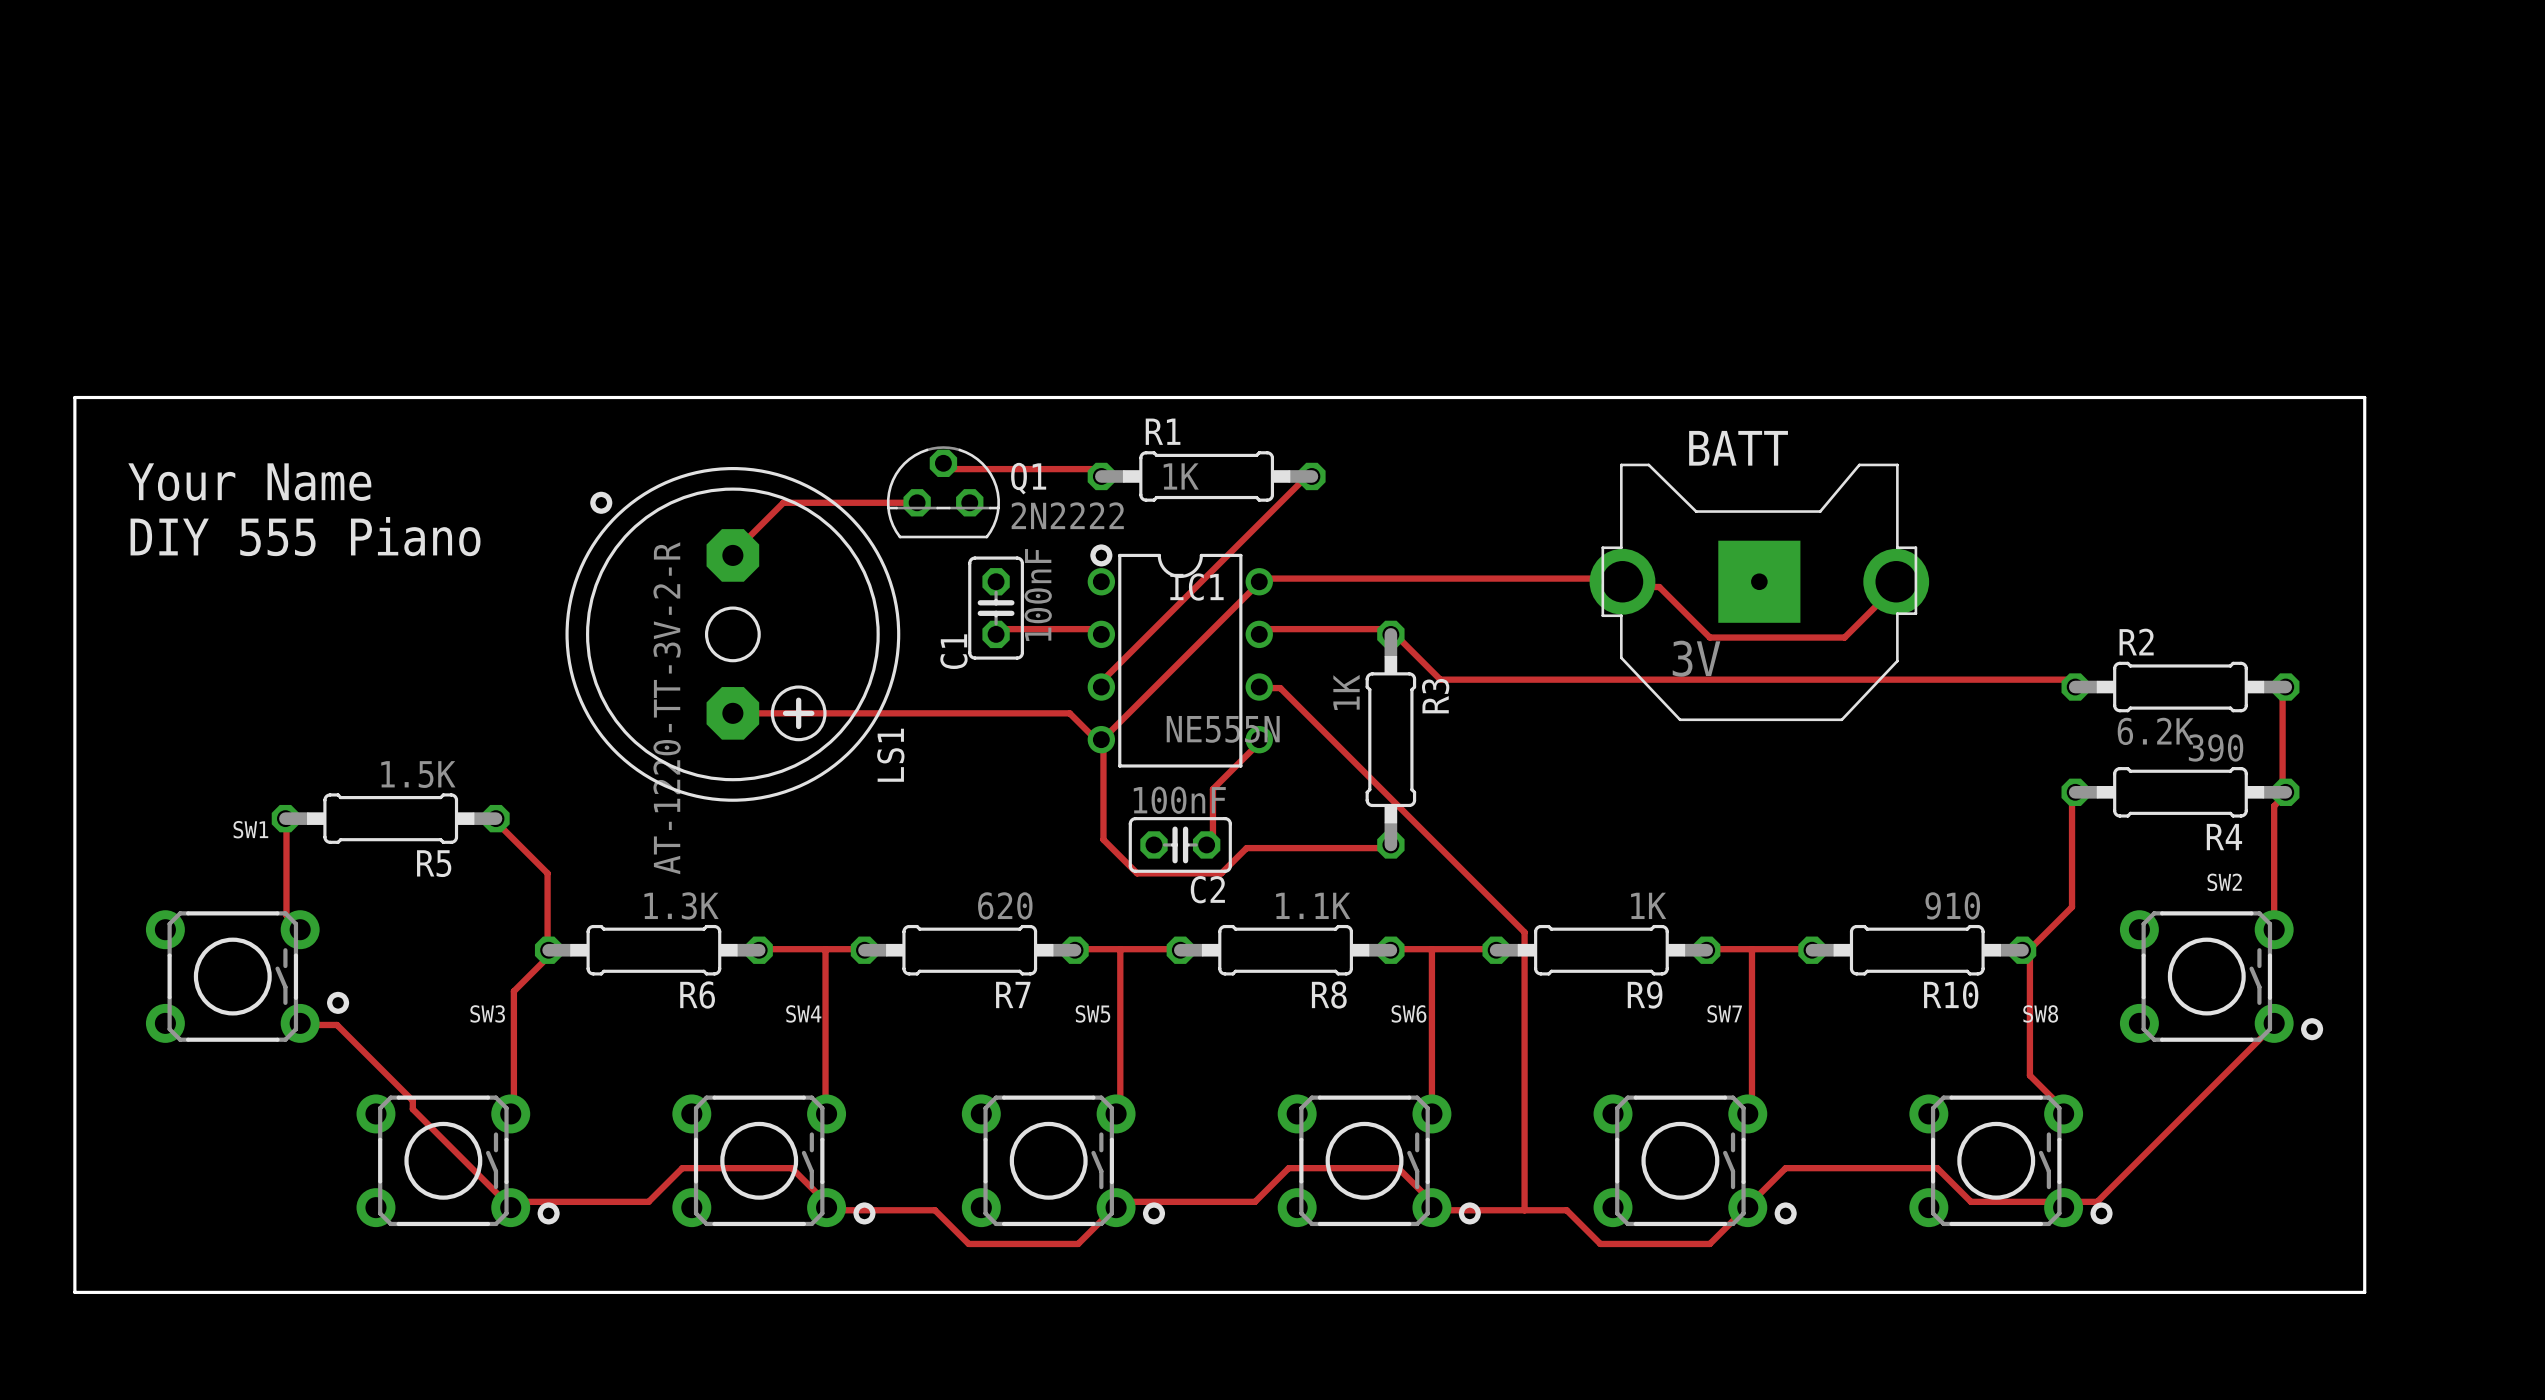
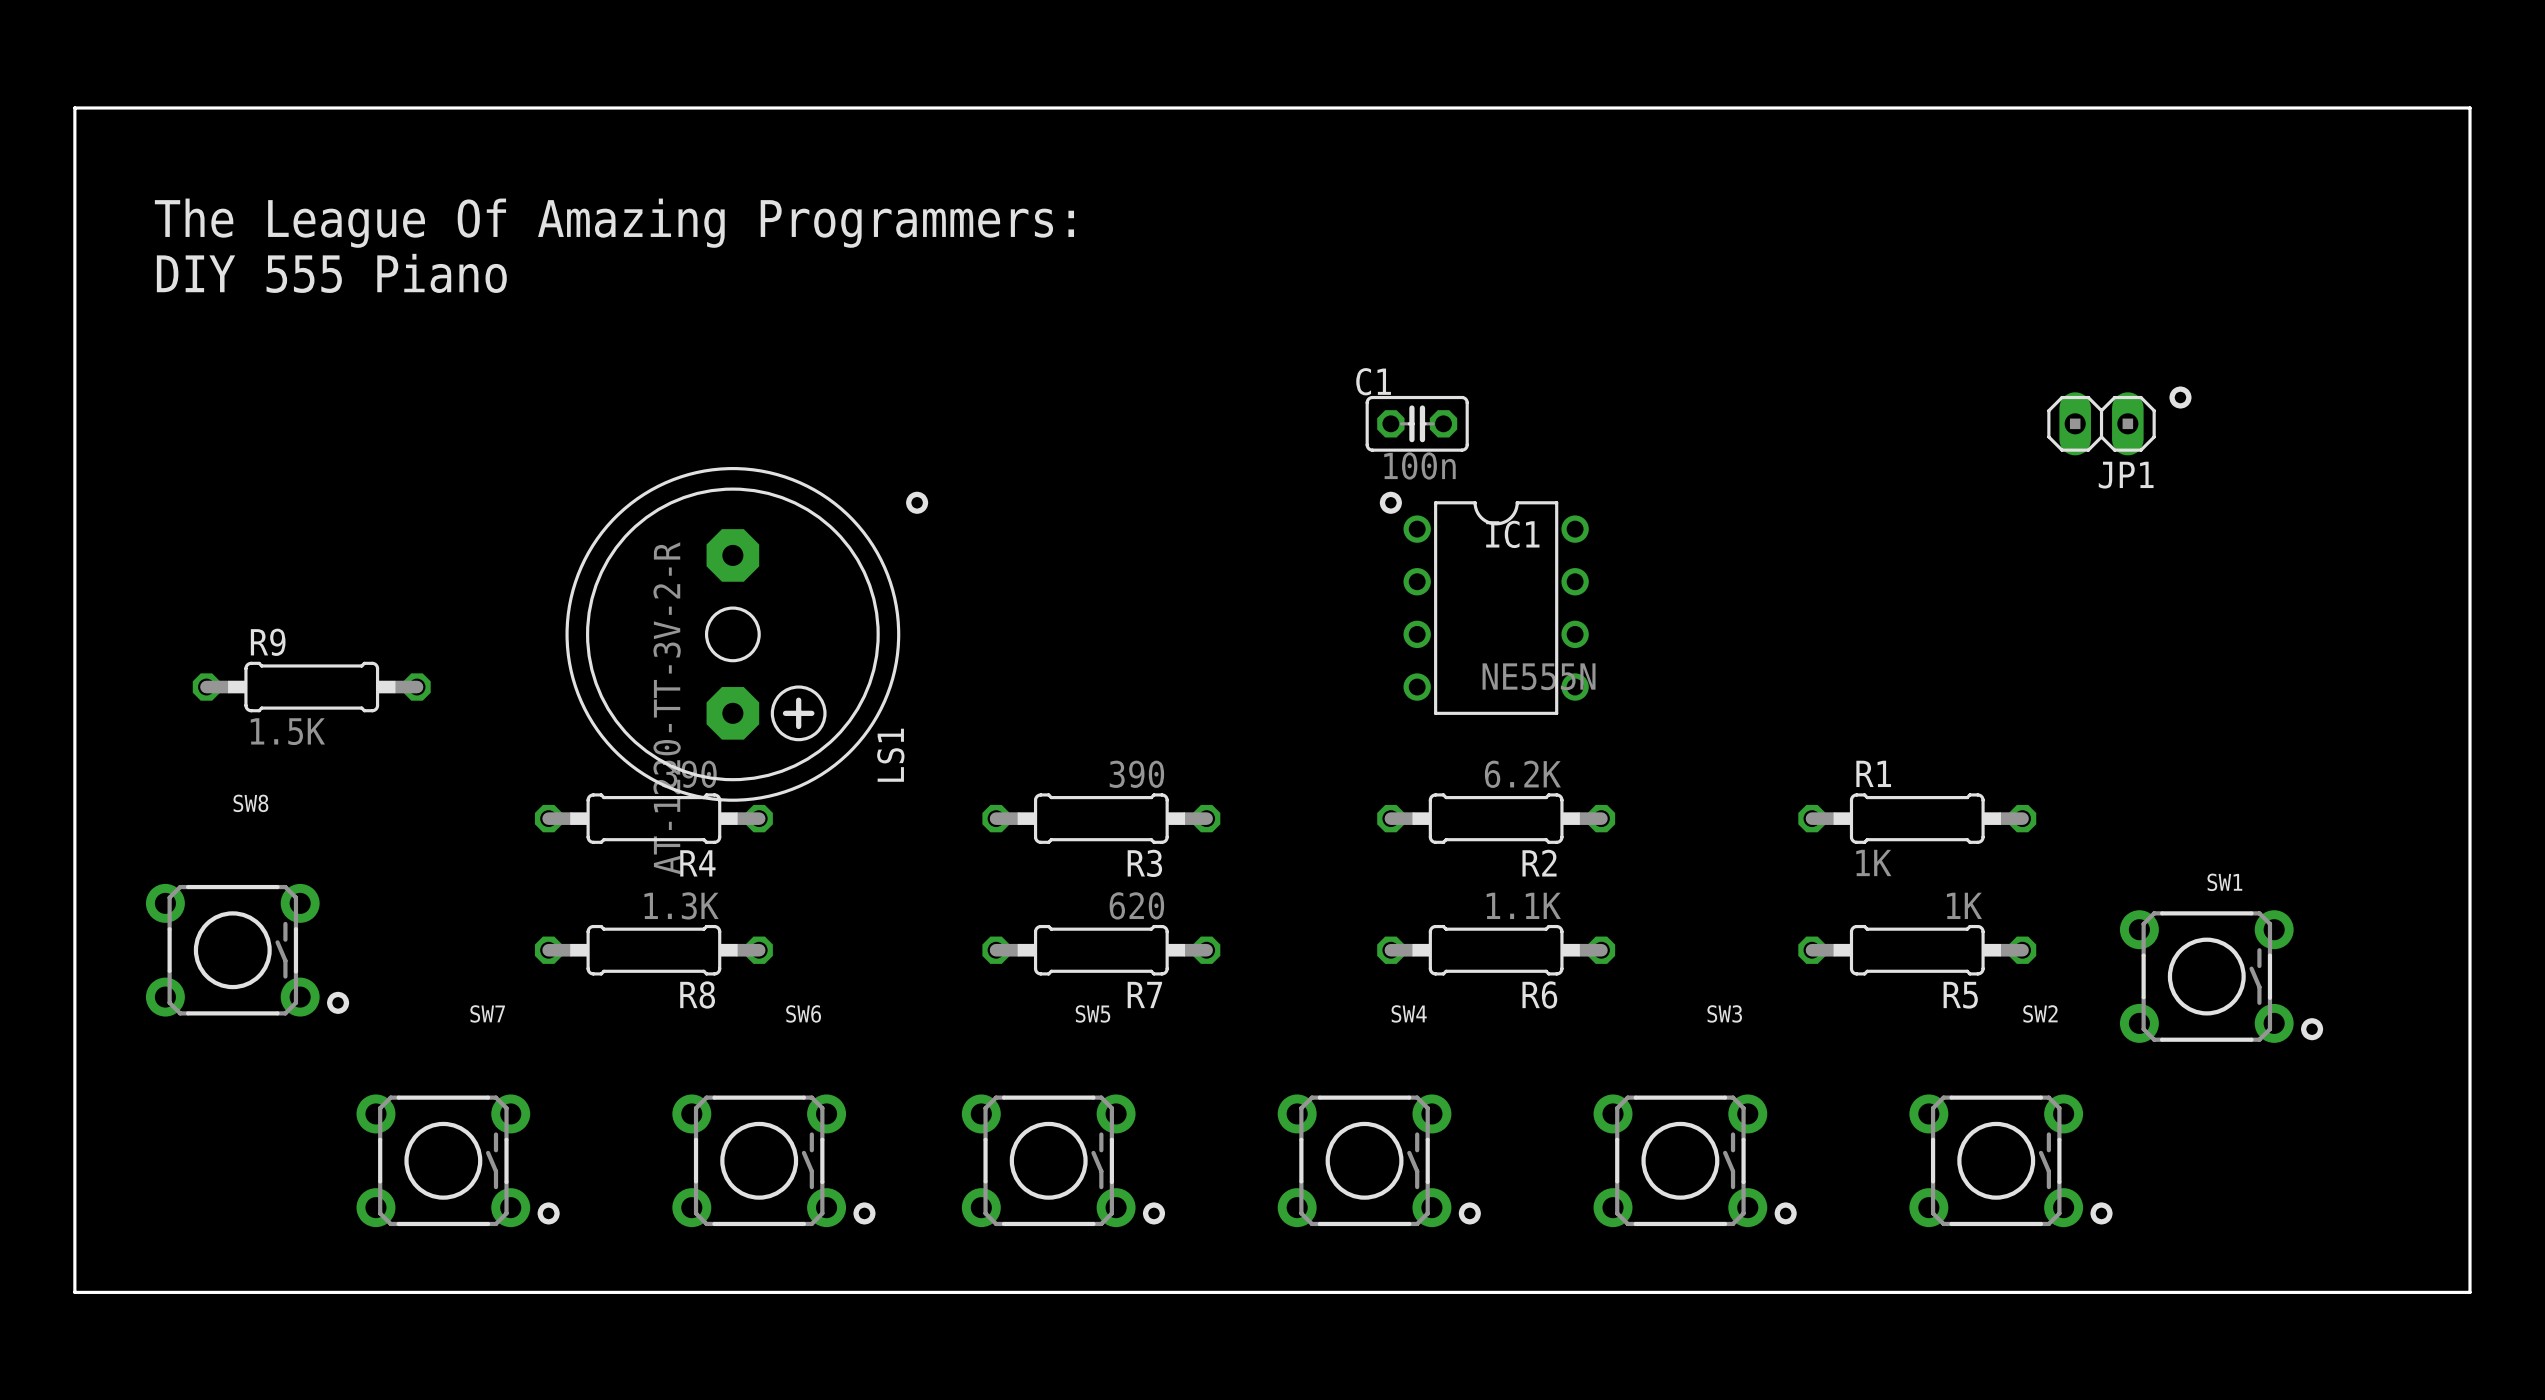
text: none -> The League Of Amazing Programmers: (614, 223)
drawing: none -> [2169, 386, 2192, 409]
board edge: (74, 397) (2364, 397) (2364, 1292) -> (74, 397) (74, 107) (2469, 107) (2469, 1292) (2364, 1292)
JP1: none -> (2101, 423)
track: (943, 463) (943, 469) (1095, 469) (1101, 476) -> none
R1 value position: 1K (1181, 476) -> 1K (1873, 862)
R1 position: (1206, 476) -> (1917, 818)
track: (1311, 476) (1305, 477) (1103, 679) (1101, 687) -> none
text: Your Name (249, 482) -> none
drawing: [590, 491, 613, 514] -> none
drawing: none -> [906, 491, 929, 514]
drawing: none -> [1379, 491, 1402, 514]
Q1: 2N2222 (943, 492) -> none
track: (917, 502) (783, 502) (732, 555) -> none
text position: DIY 555 Piano (305, 536) -> DIY 555 Piano (331, 273)
drawing: [1090, 544, 1113, 567] -> none
track: (1896, 581) (1895, 587) (1844, 637) (1709, 637) (1659, 587) (1625, 587) (1617, 578) (1263, 578) (1101, 739) -> none
BATT: 3V (1759, 592) -> none
C1 value: 100nF (1038, 595) -> 100n (1419, 465)
C1 rotation: 0° (996, 608) -> 90° clockwise (1417, 423)
C1 position: (996, 608) -> (1417, 423)
track: (996, 634) (1002, 629) (1095, 629) (1101, 634) -> none
track: (1259, 634) (1263, 629) (1389, 629) (1390, 634) (1398, 637) (1440, 679) (2072, 679) (2075, 687) -> none
R2 name position: R2 (2136, 642) -> R2 (1539, 863)
IC1 position: (1180, 660) -> (1496, 608)
track: (1259, 687) (1280, 688) (1524, 932) (1524, 1210) -> none
R2 position: (2180, 687) -> (1496, 818)
track: (2285, 687) (2282, 688) (2282, 789) (2285, 792) (2274, 805) (2274, 929) -> none
R3 value: 1K (1346, 692) -> 390 (1136, 774)
track: (732, 713) (1069, 713) (1095, 738) (1101, 739) -> none
R2 value position: 6.2K (2155, 731) -> 6.2K (1522, 774)
track: (1101, 739) (1103, 747) (1103, 839) (1137, 873) (1221, 873) (1246, 848) (1389, 848) (1390, 844) -> none
track: (1259, 739) (1255, 747) (1212, 789) (1212, 839) (1206, 844) -> none
R3 rotation: 0° (1390, 739) -> 90° clockwise (1101, 818)
R3 position: (1390, 739) -> (1101, 818)
track: (2075, 792) (2072, 797) (2072, 907) (2029, 949) (2022, 950) (2029, 957) (2029, 1075) (2063, 1109) (2063, 1113) -> none
R4 position: (2180, 792) -> (653, 818)
track: (285, 818) (286, 915) (300, 929) -> none
R5: 1.5K (390, 818) -> none
track: (495, 818) (497, 822) (547, 873) (547, 957) (513, 991) (513, 1109) (510, 1113) -> none
C2: 100nF (1180, 844) -> none
SW2 name: SW2 (2224, 882) -> SW1 (2224, 882)
R9 value: 1K (1648, 905) -> 1.5K (287, 731)
R10 value: 910 (1952, 905) -> 1K (1964, 905)
track: (825, 949) (826, 1113) -> none
track: (1120, 949) (1120, 1109) (1116, 1113) -> none
track: (1431, 949) (1431, 1113) -> none
track: (1751, 949) (1751, 1109) (1747, 1113) -> none
SW8: none -> (232, 950)
track: (759, 950) (864, 950) -> none
R7 position: (969, 950) -> (1101, 950)
track: (1075, 950) (1180, 950) -> none
R8: 1.1K (1285, 950) -> none
track: (1390, 950) (1496, 950) -> none
R6: none -> 1.1K (1496, 950)
R9 position: (1601, 950) -> (311, 687)
track: (1706, 950) (1811, 950) -> none
SW1: (232, 976) -> none
R6 name: R6 (697, 994) -> R8 (697, 994)
R9 name position: R9 (1645, 994) -> R9 (268, 642)
R10 name: R10 (1951, 994) -> R5 (1960, 995)
SW3 name: SW3 (487, 1013) -> SW7 (487, 1013)
SW4 name: SW4 (803, 1013) -> SW6 (803, 1013)
SW6 name: SW6 (1408, 1013) -> SW4 (1409, 1013)
SW7 name: SW7 (1724, 1013) -> SW3 (1724, 1013)
SW8 name: SW8 (2040, 1013) -> SW2 (2040, 1013)
track: (300, 1023) (337, 1024) (412, 1100) (412, 1109) (510, 1207) (513, 1201) (648, 1201) (682, 1168) (791, 1168) (825, 1201) (826, 1207) (833, 1210) (935, 1210) (968, 1243) (1078, 1243) (1120, 1201) (1255, 1201) (1288, 1168) (1398, 1168) (1431, 1201) (1431, 1210) (1566, 1210) (1600, 1243) (1709, 1243) (1785, 1168) (1937, 1168) (1970, 1201) (2097, 1201) (2274, 1023) -> none

